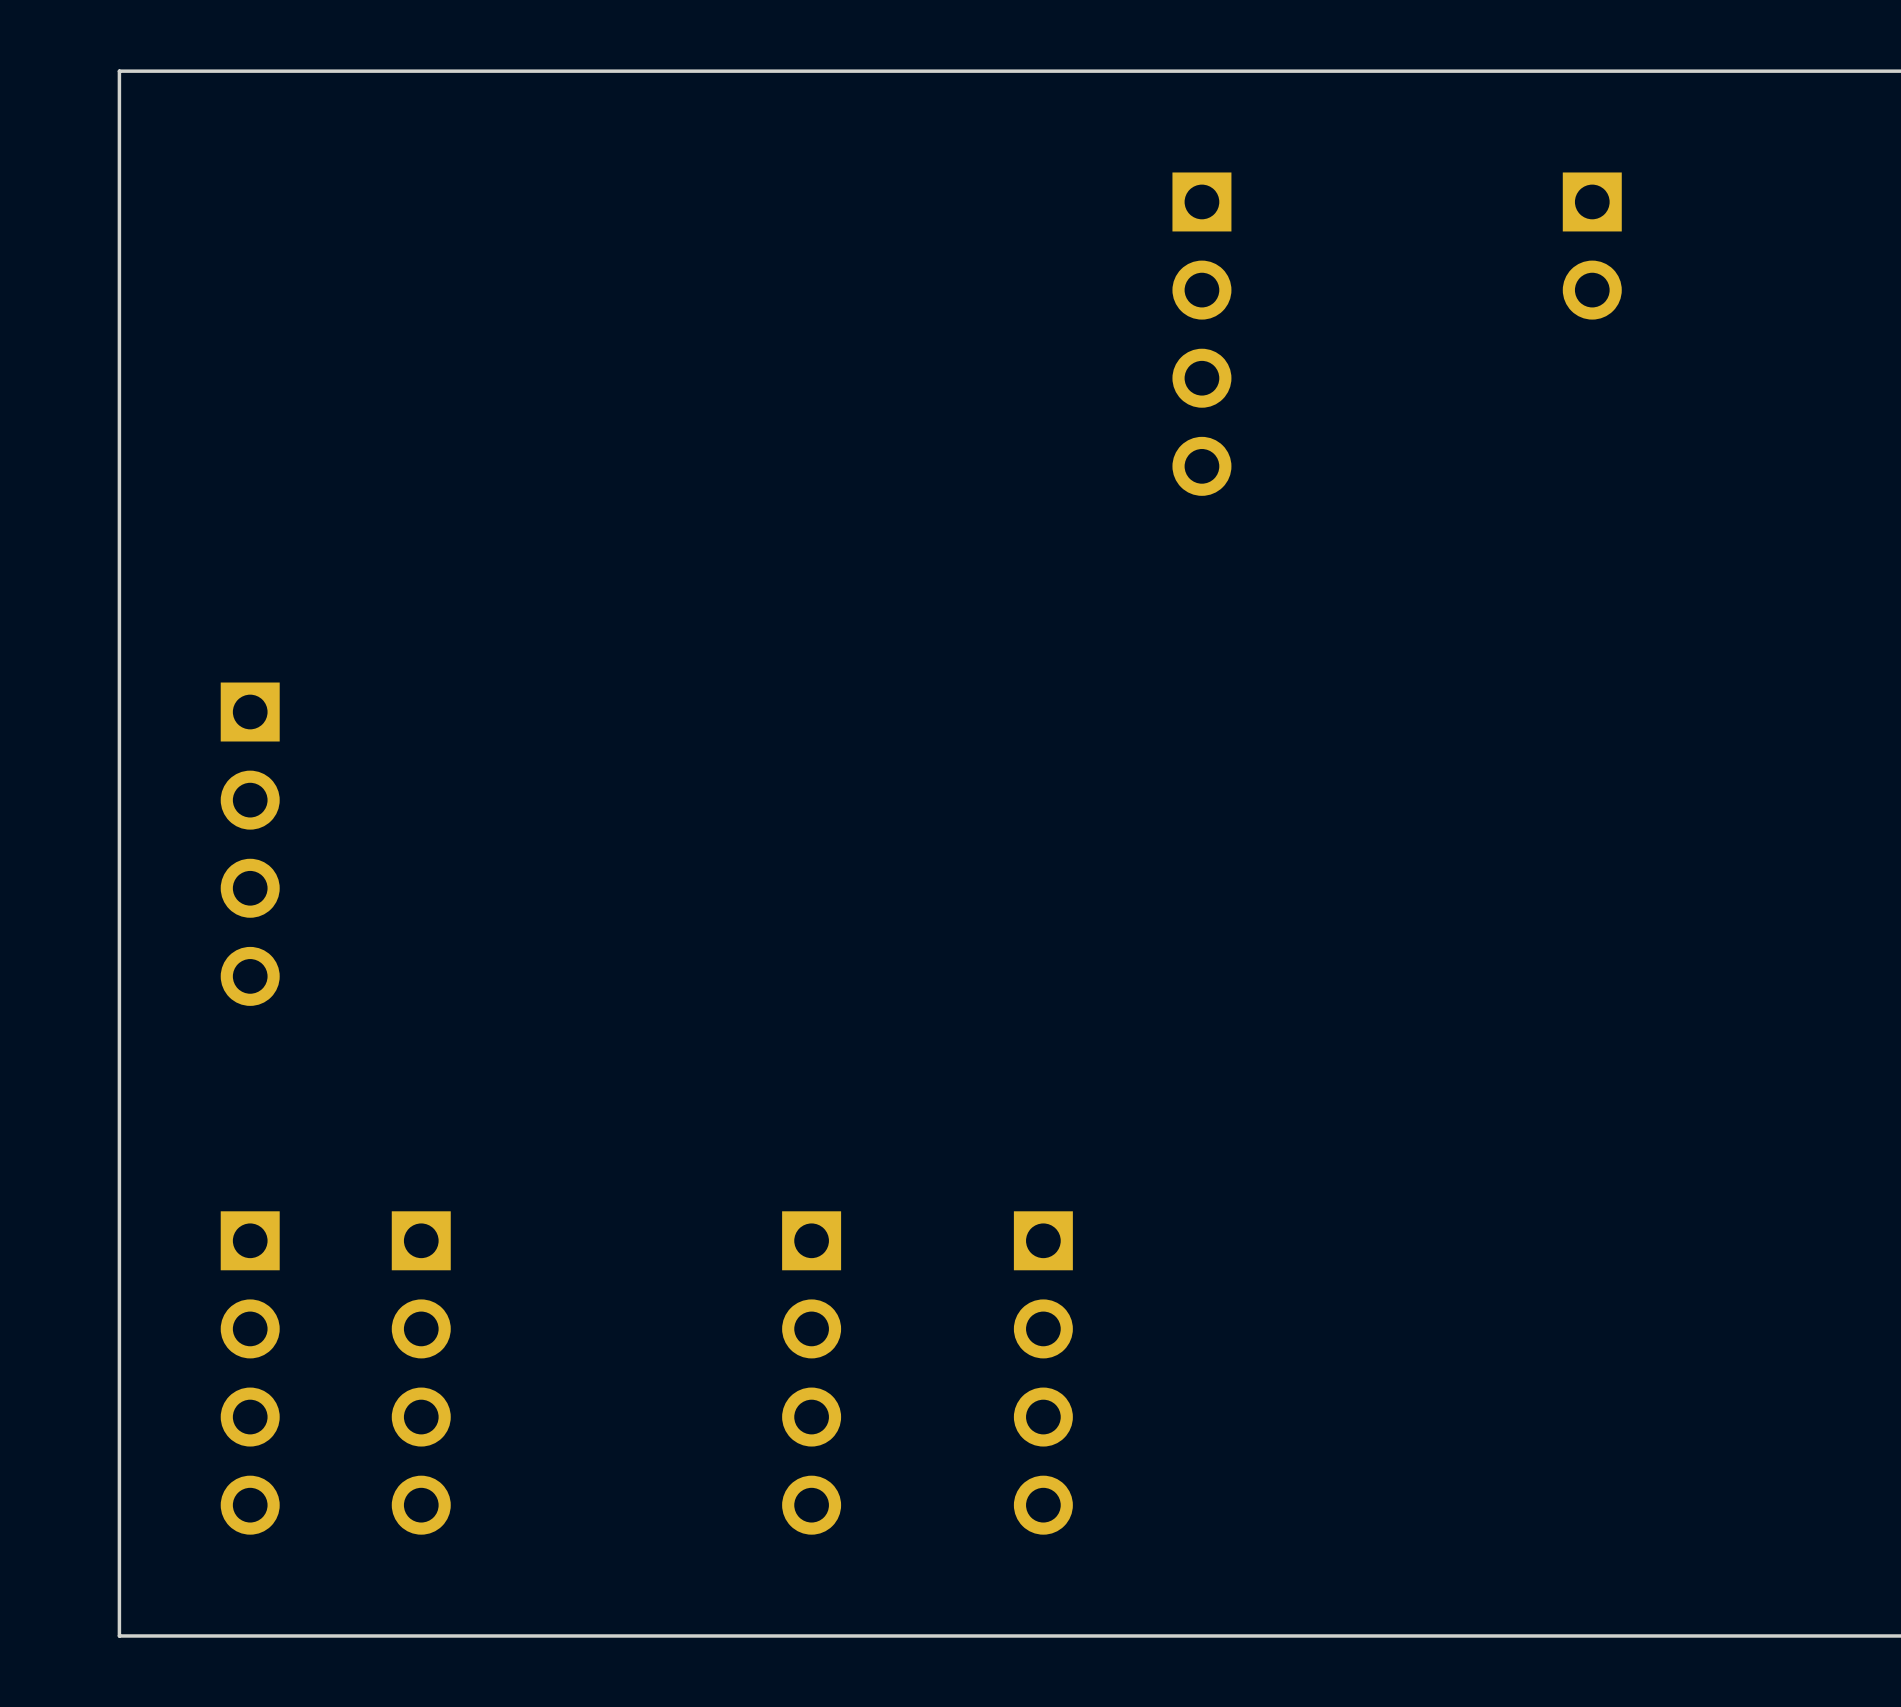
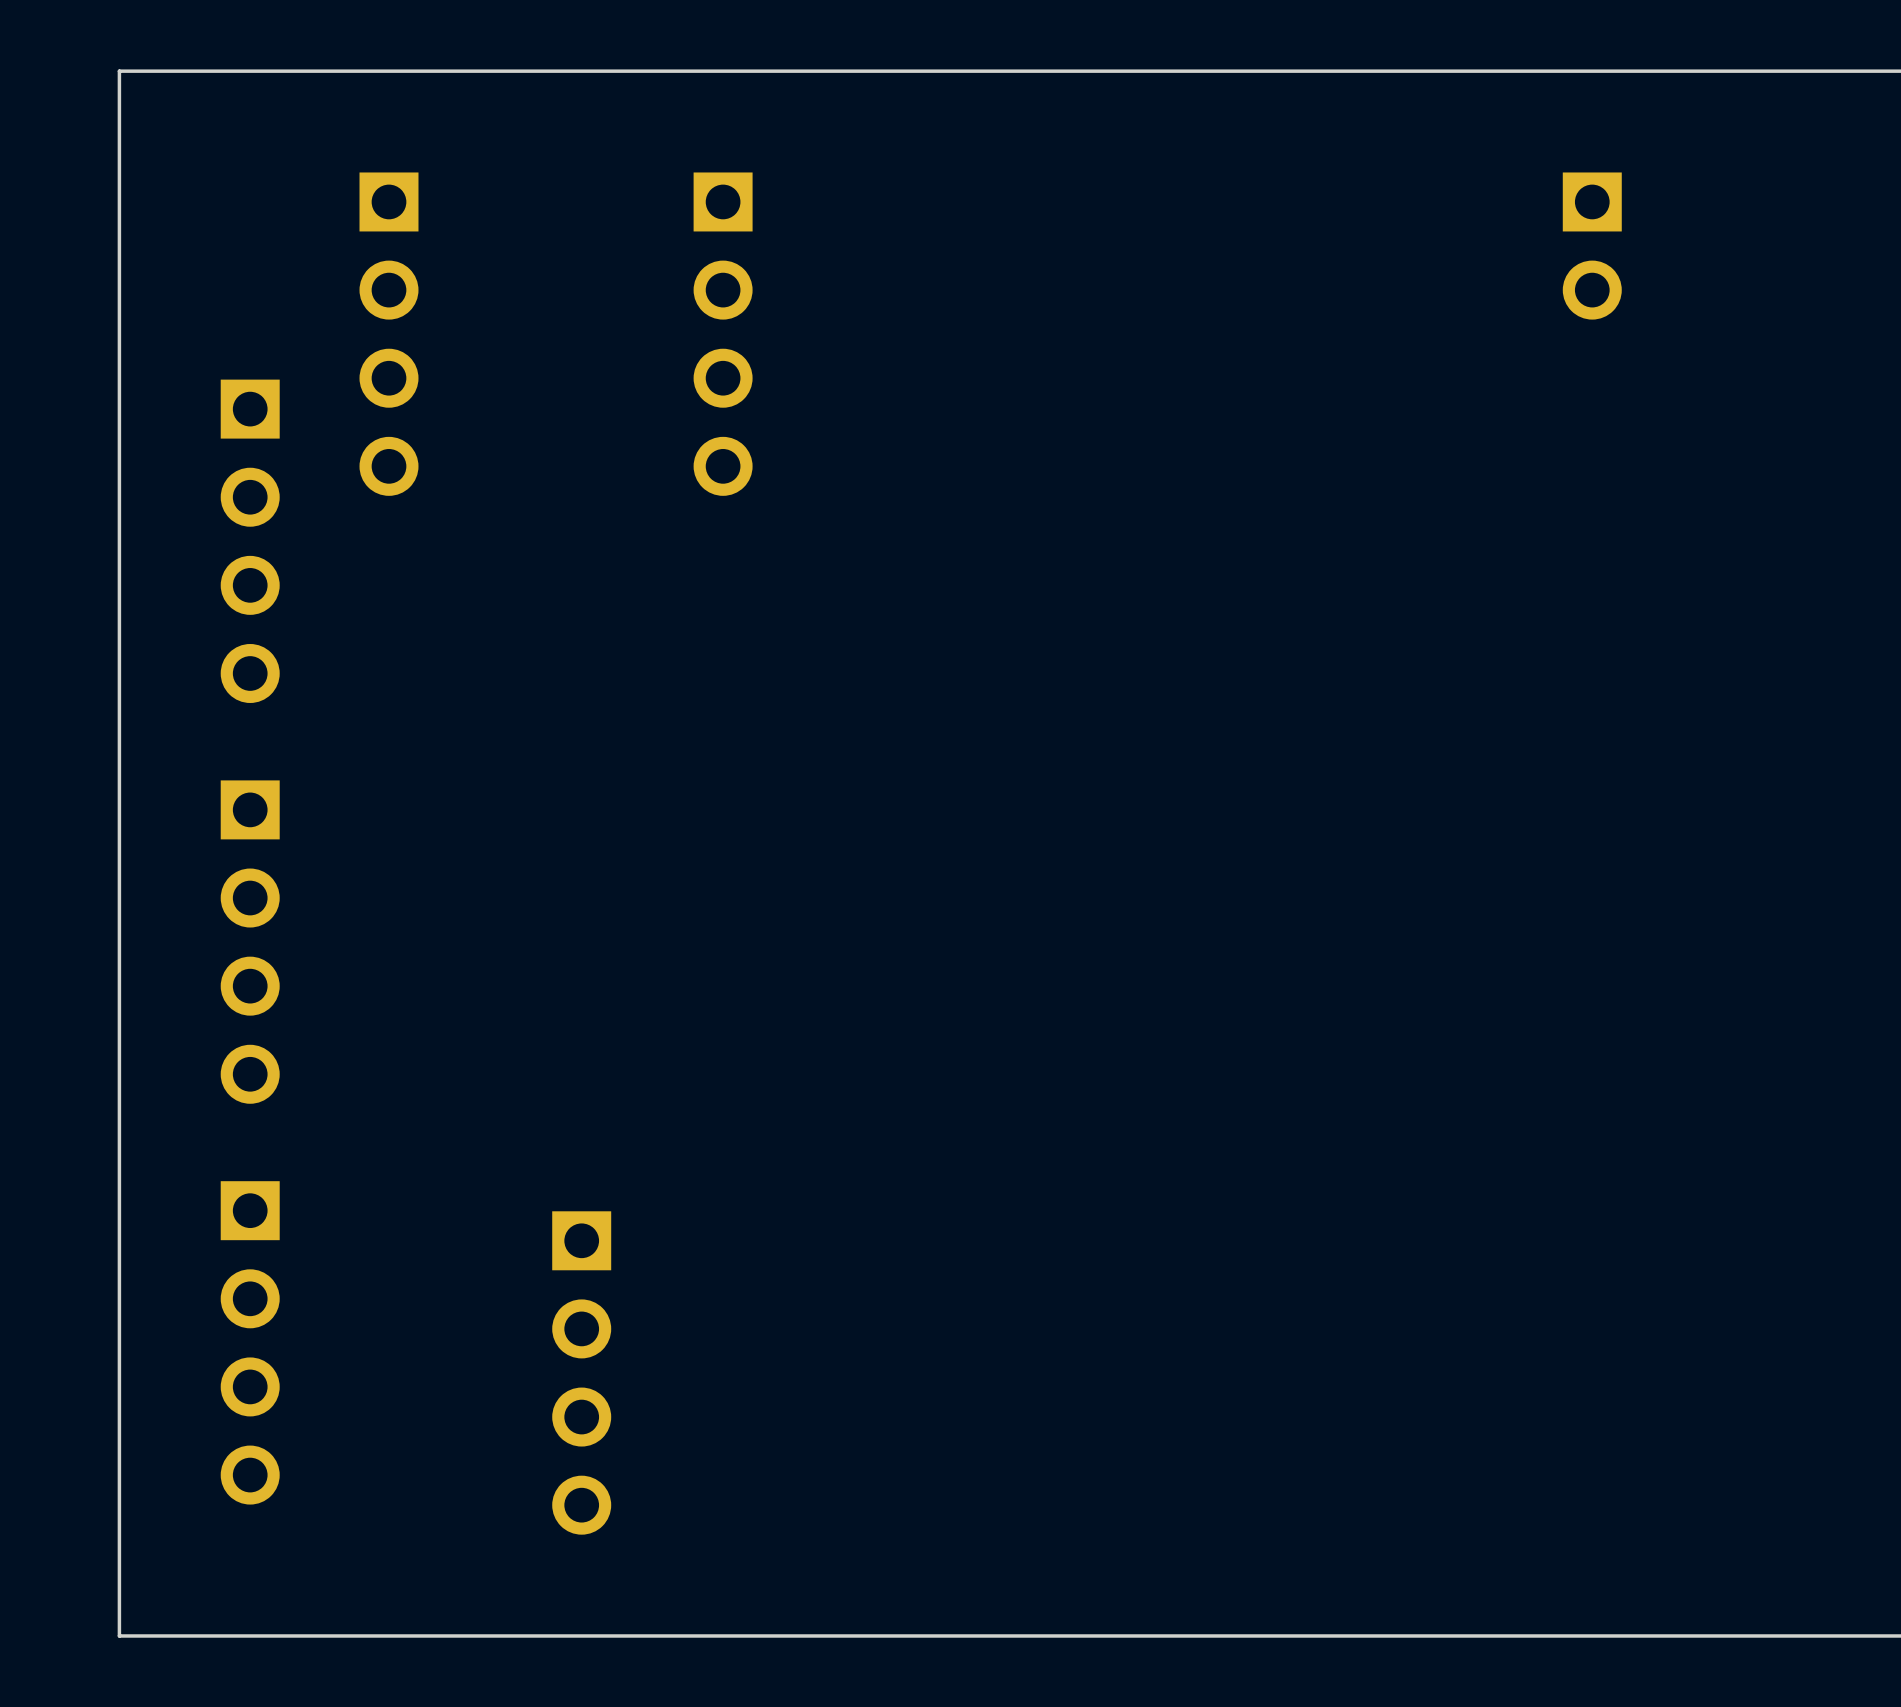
part: none -> (389, 334)
part: none -> (723, 334)
part: (1201, 334) -> none
part: none -> (250, 541)
part position: (250, 844) -> (250, 942)
part position: (250, 1372) -> (250, 1342)
part: (421, 1372) -> none
part: none -> (581, 1372)
part: (811, 1372) -> none
part: (1043, 1372) -> none

